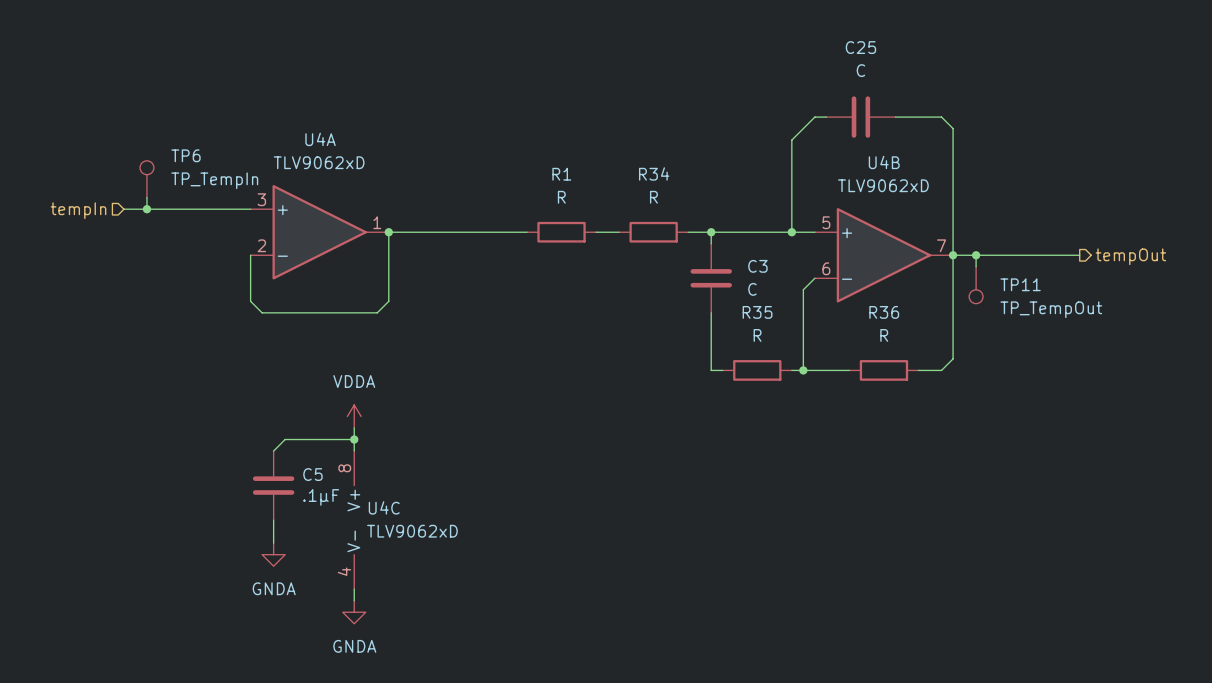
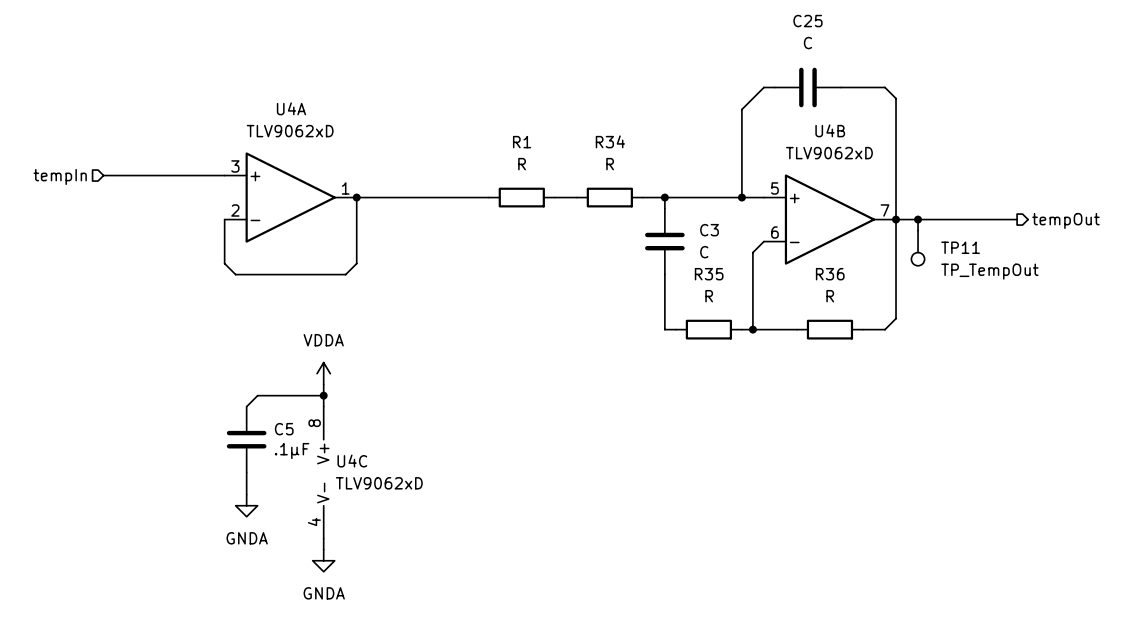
TP6: TP_TempIn (146, 179) -> none
wire: (146, 197) (146, 209) -> none
junction: (146, 209) -> none

